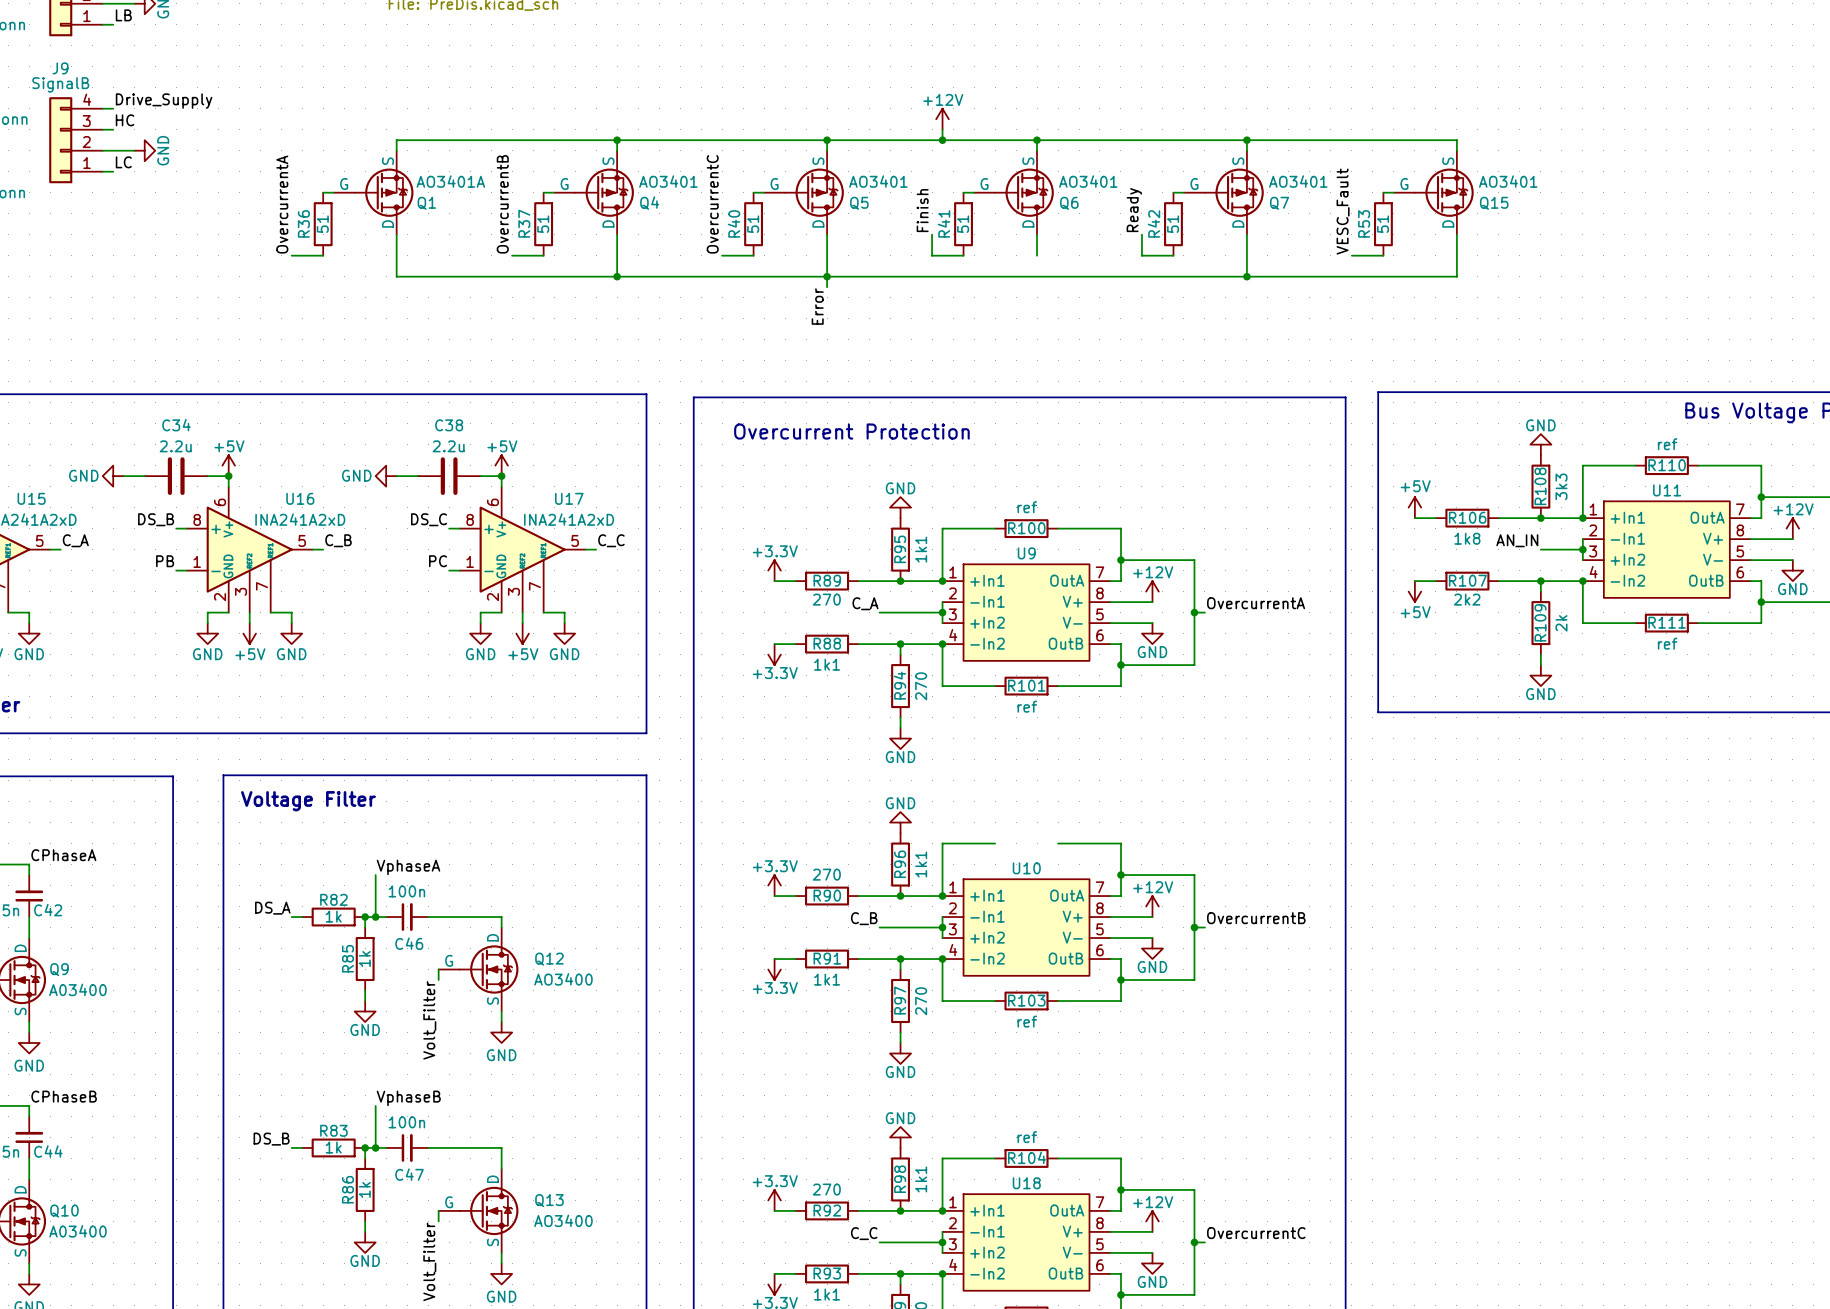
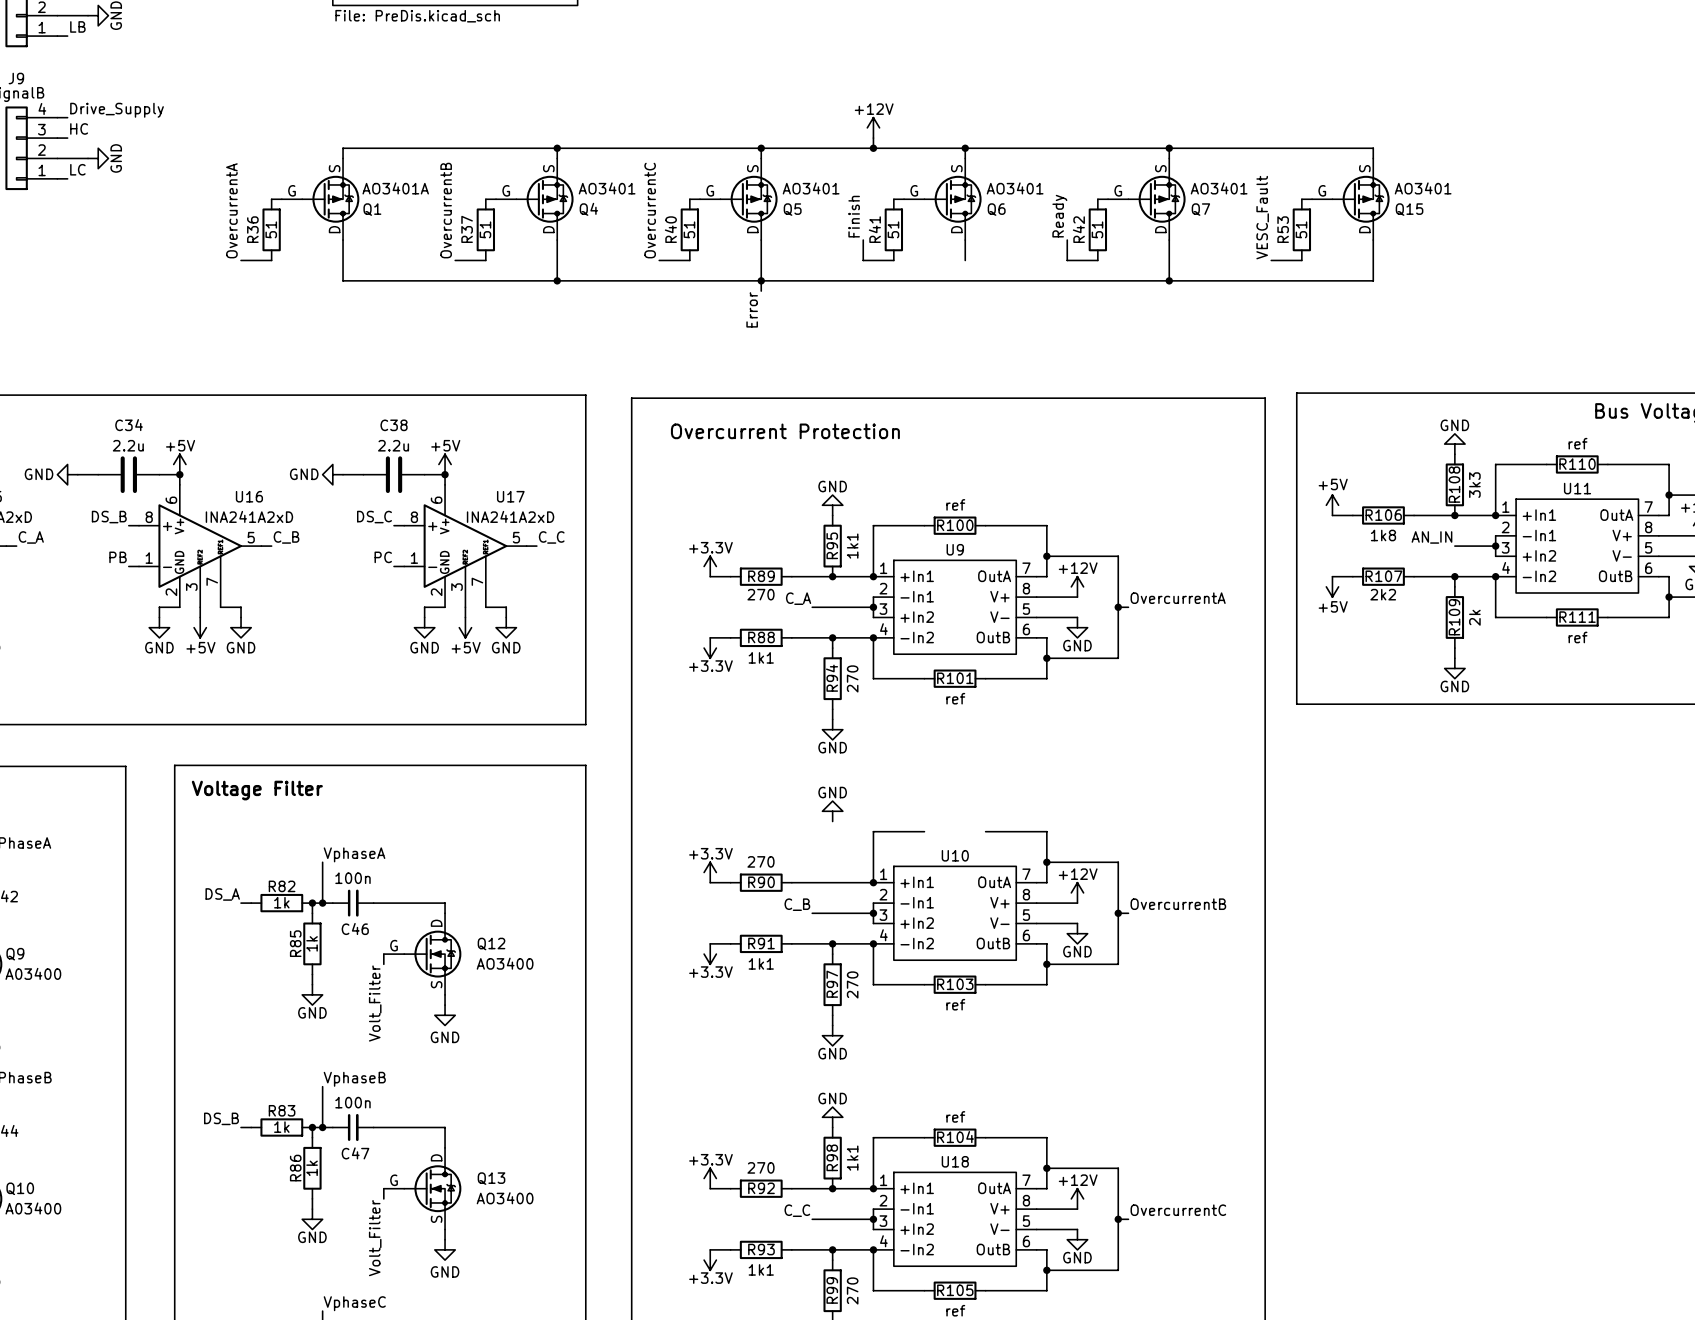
R96: 1k1 (900, 864) -> none
junction: (900, 896) -> none

